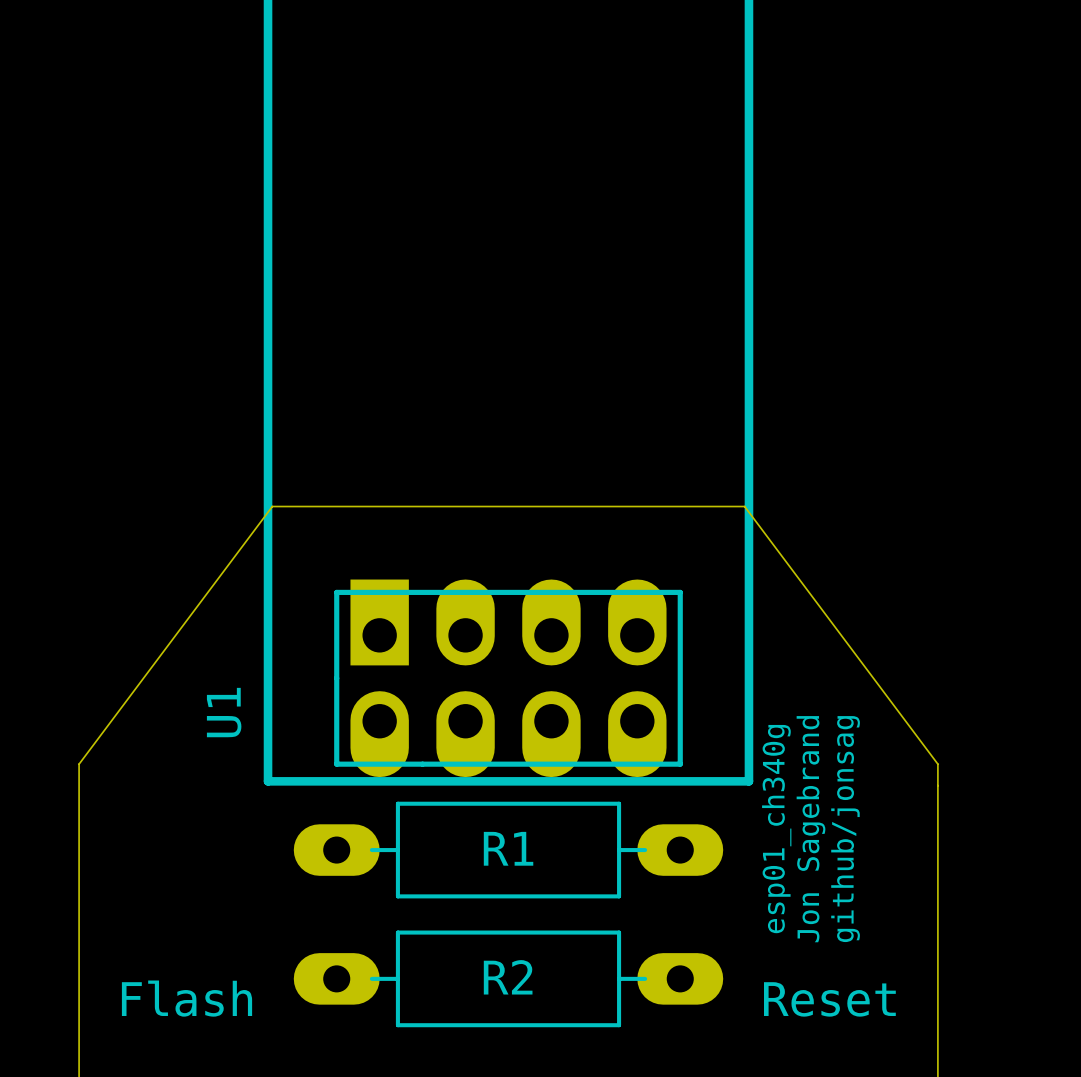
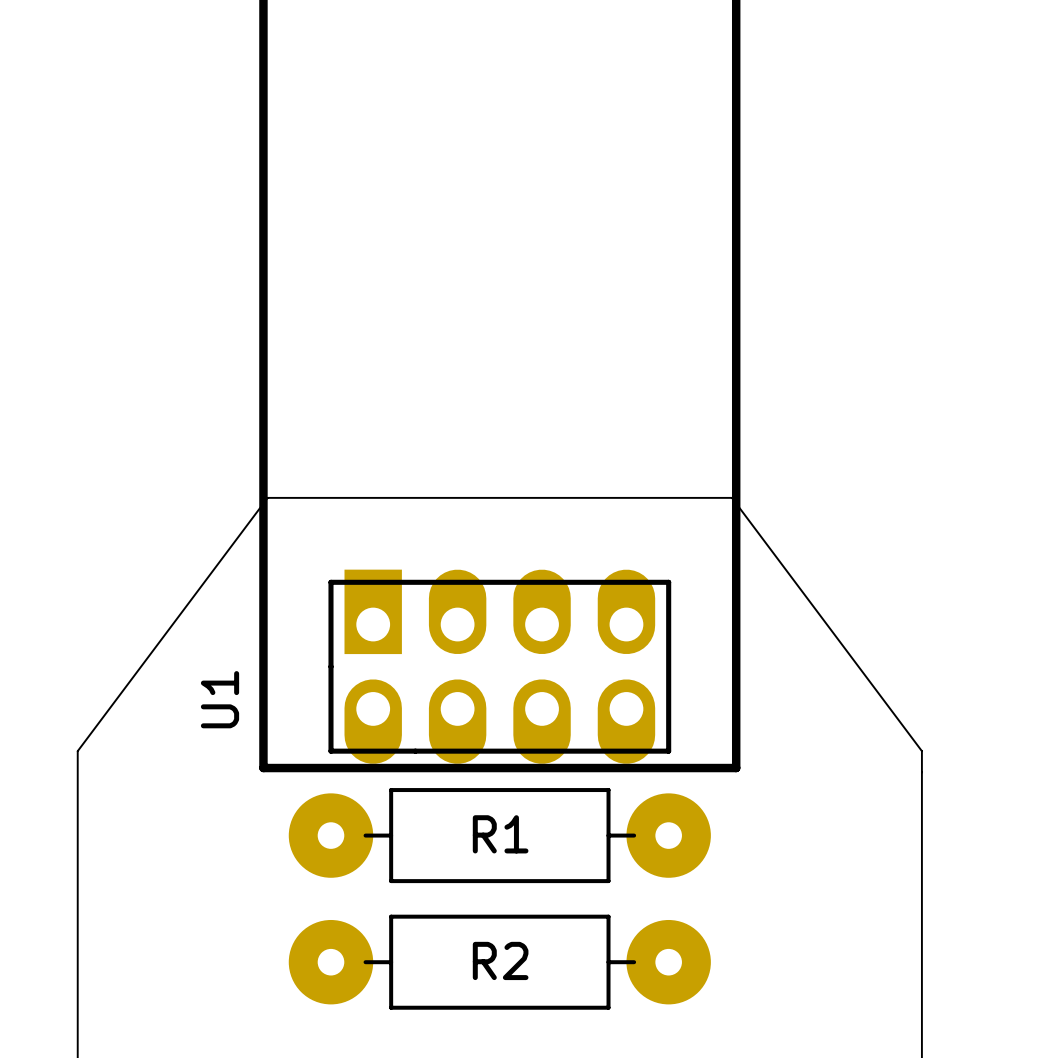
R1 footprint: [293, 801, 724, 899] -> [288, 788, 711, 884]
text: esp01_ch340g (776, 829) -> none
text: Jon Sagebrand (810, 829) -> none
text: github/jonsag (845, 829) -> none
R2 footprint: [293, 930, 724, 1028] -> [288, 914, 711, 1010]
text: Flash (187, 998) -> none
text: Reset (829, 999) -> none

